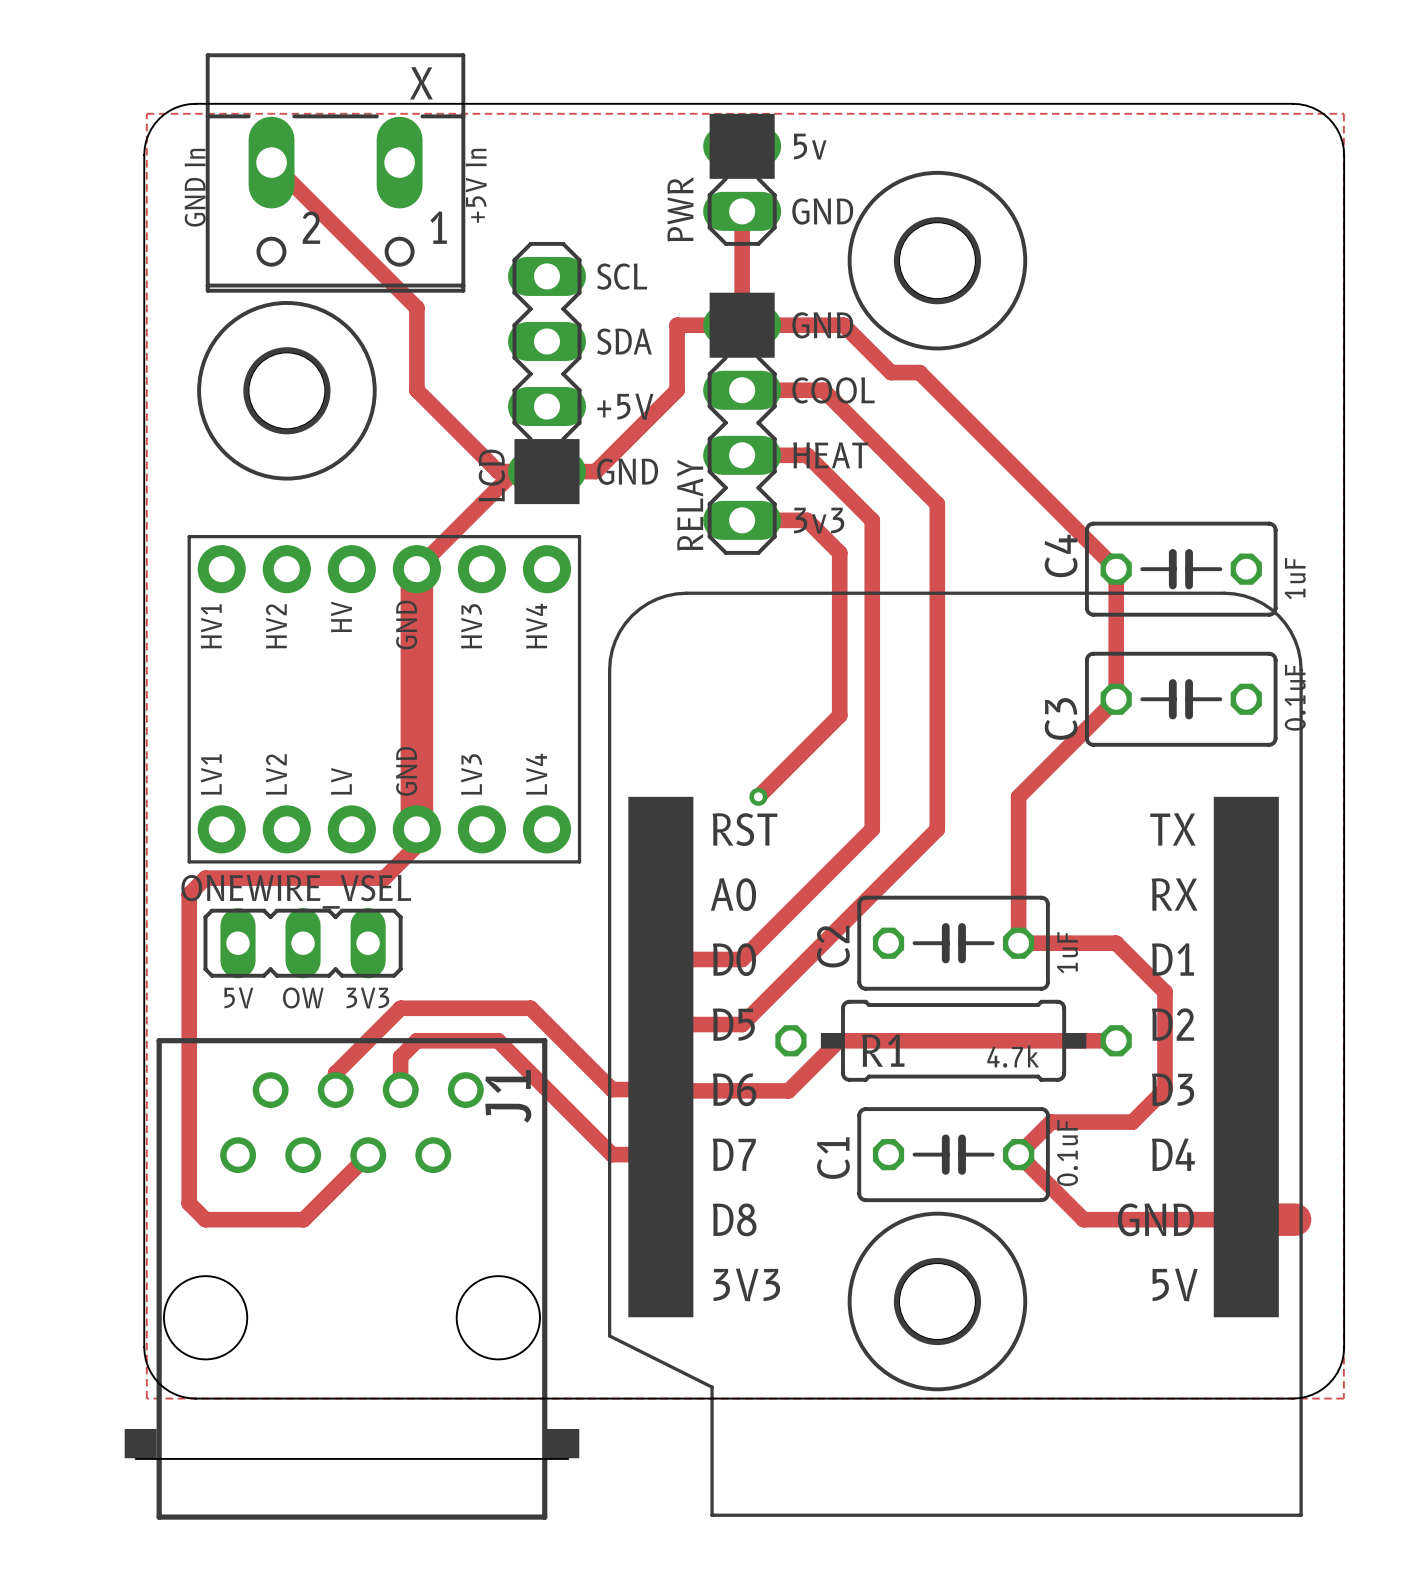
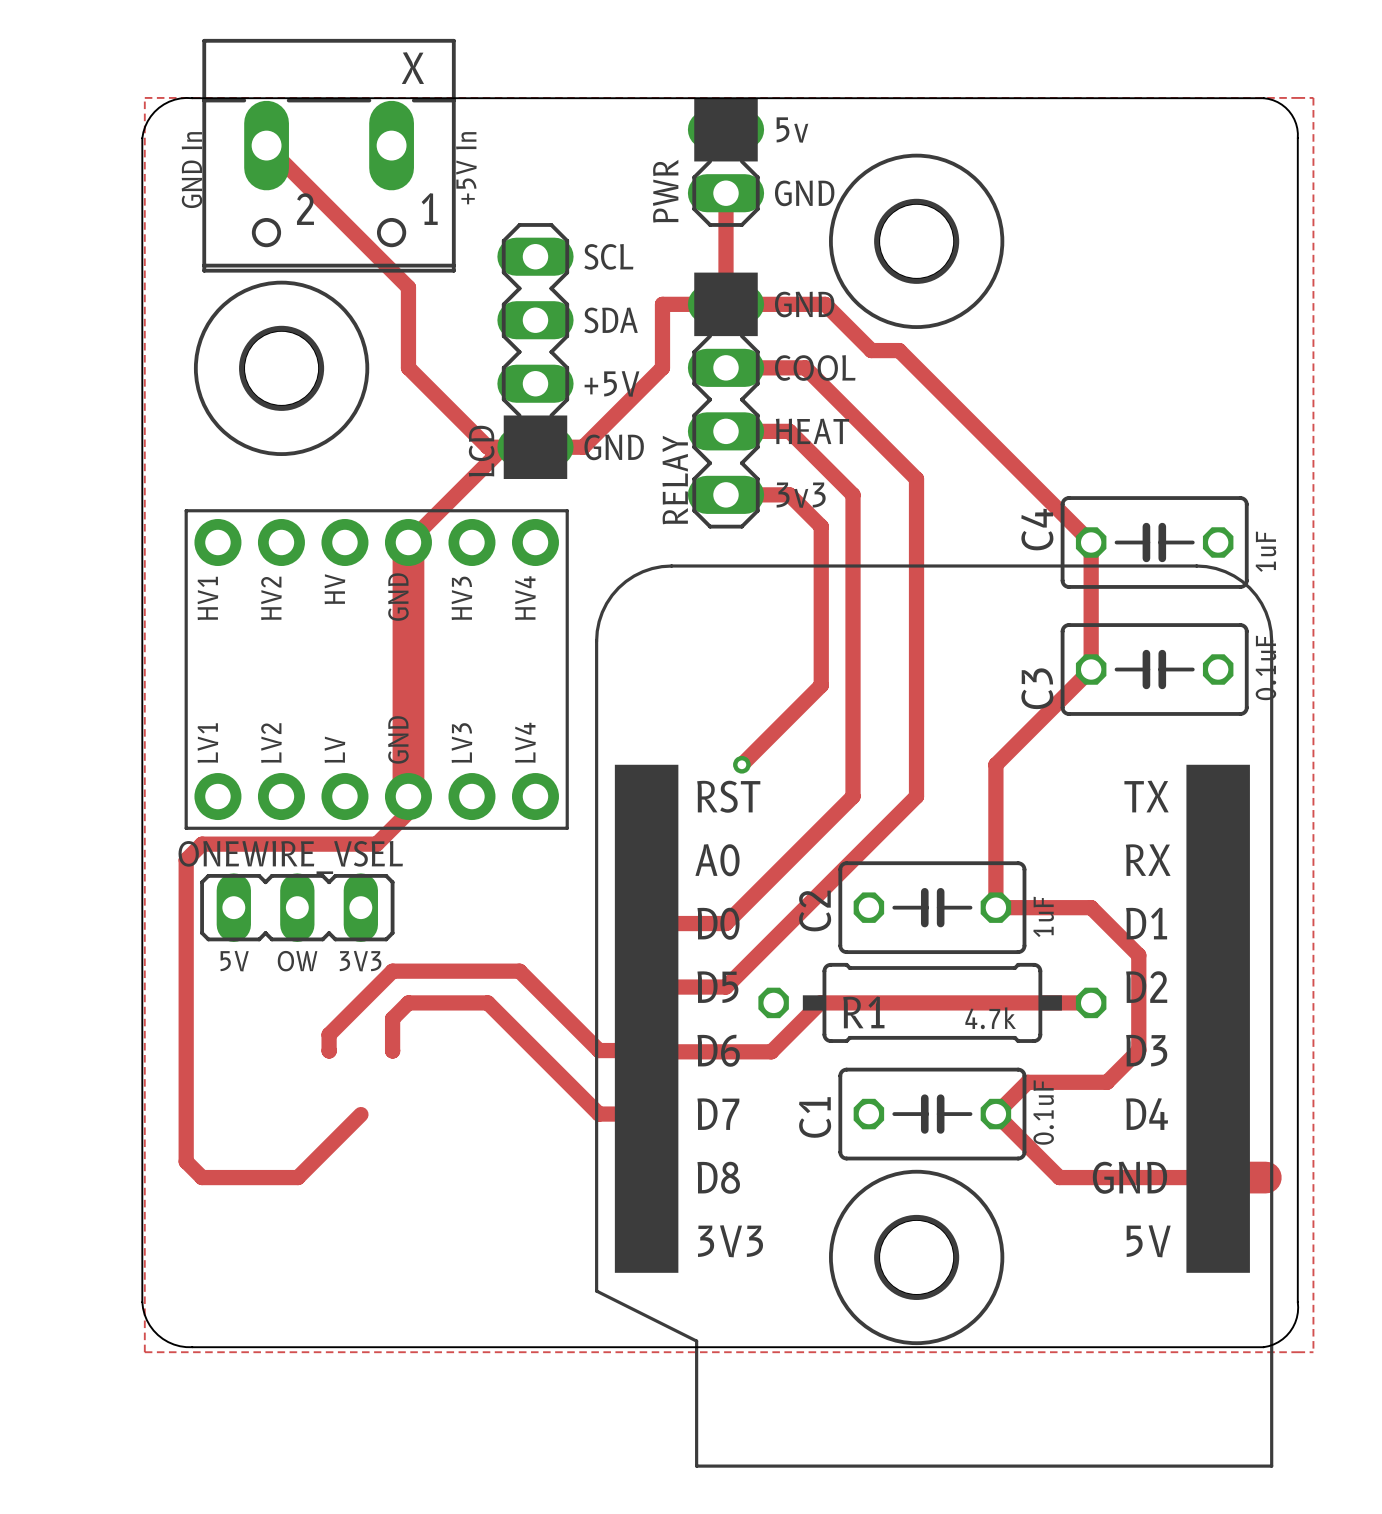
board edge: (144, 155) (148, 135) (159, 118) (175, 107) (195, 103) (1292, 103) (1312, 107) (1329, 118) (1340, 135) (1344, 155) (1344, 1347) (1340, 1366) (1329, 1383) (1312, 1394) (1292, 1398) (195, 1398) (175, 1394) (159, 1383) (148, 1366) (144, 1347) -> (142, 138) (147, 121) (159, 107) (174, 99) (186, 97) (1263, 98) (1273, 100) (1285, 107) (1294, 119) (1297, 133) (1298, 1307) (1296, 1317) (1290, 1331) (1278, 1342) (1263, 1347) (192, 1347) (173, 1344) (157, 1335) (146, 1320) (142, 1302)
J1: (351, 1278) -> none

